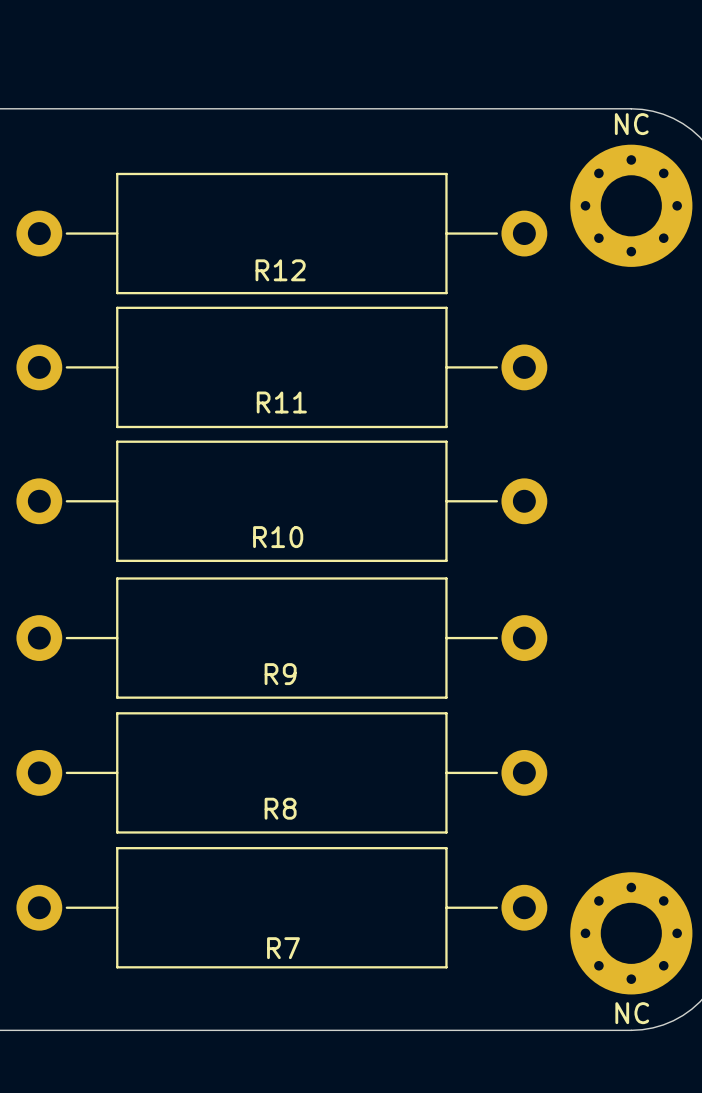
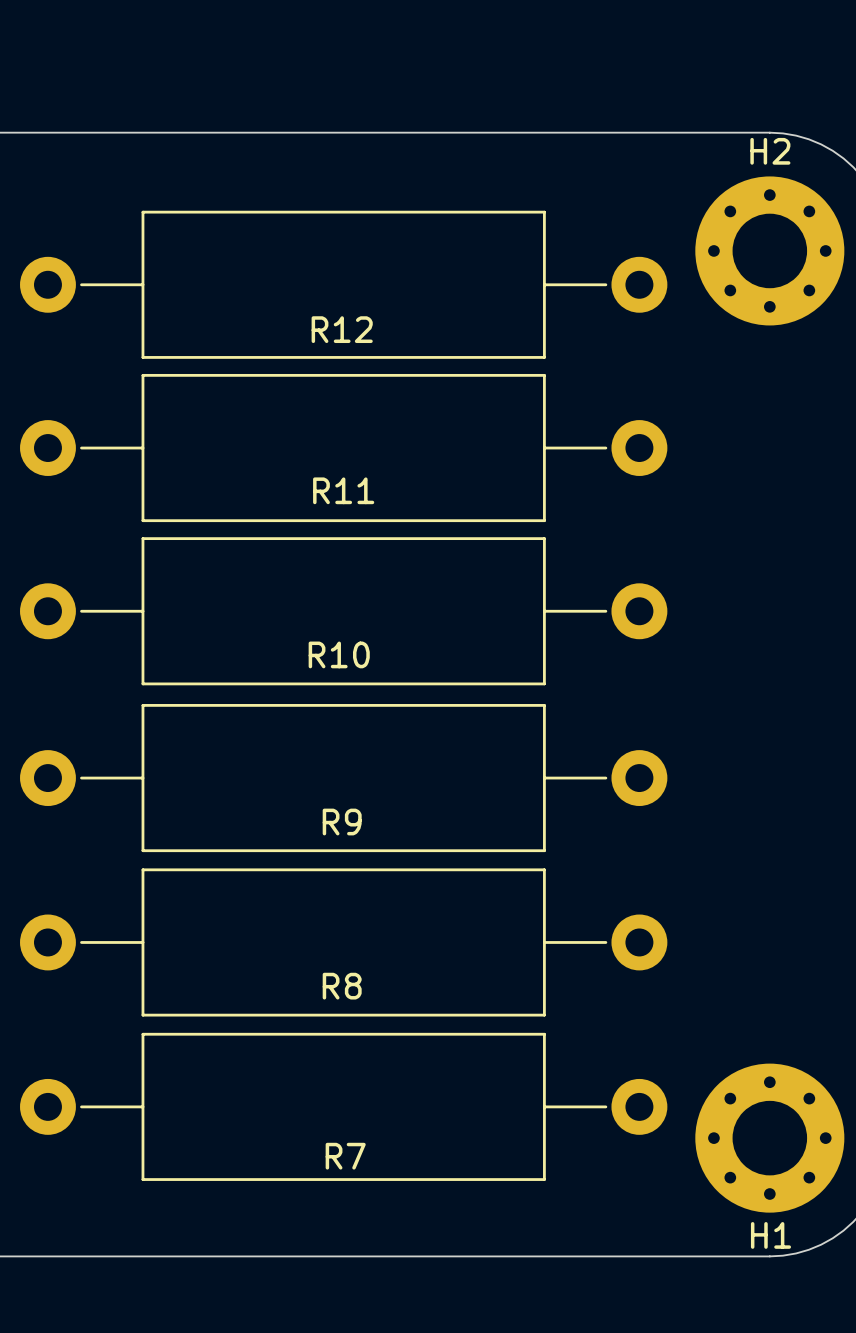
NC name: NC (631, 124) -> H2 (770, 151)
NC name: NC (632, 1013) -> H1 (770, 1235)

